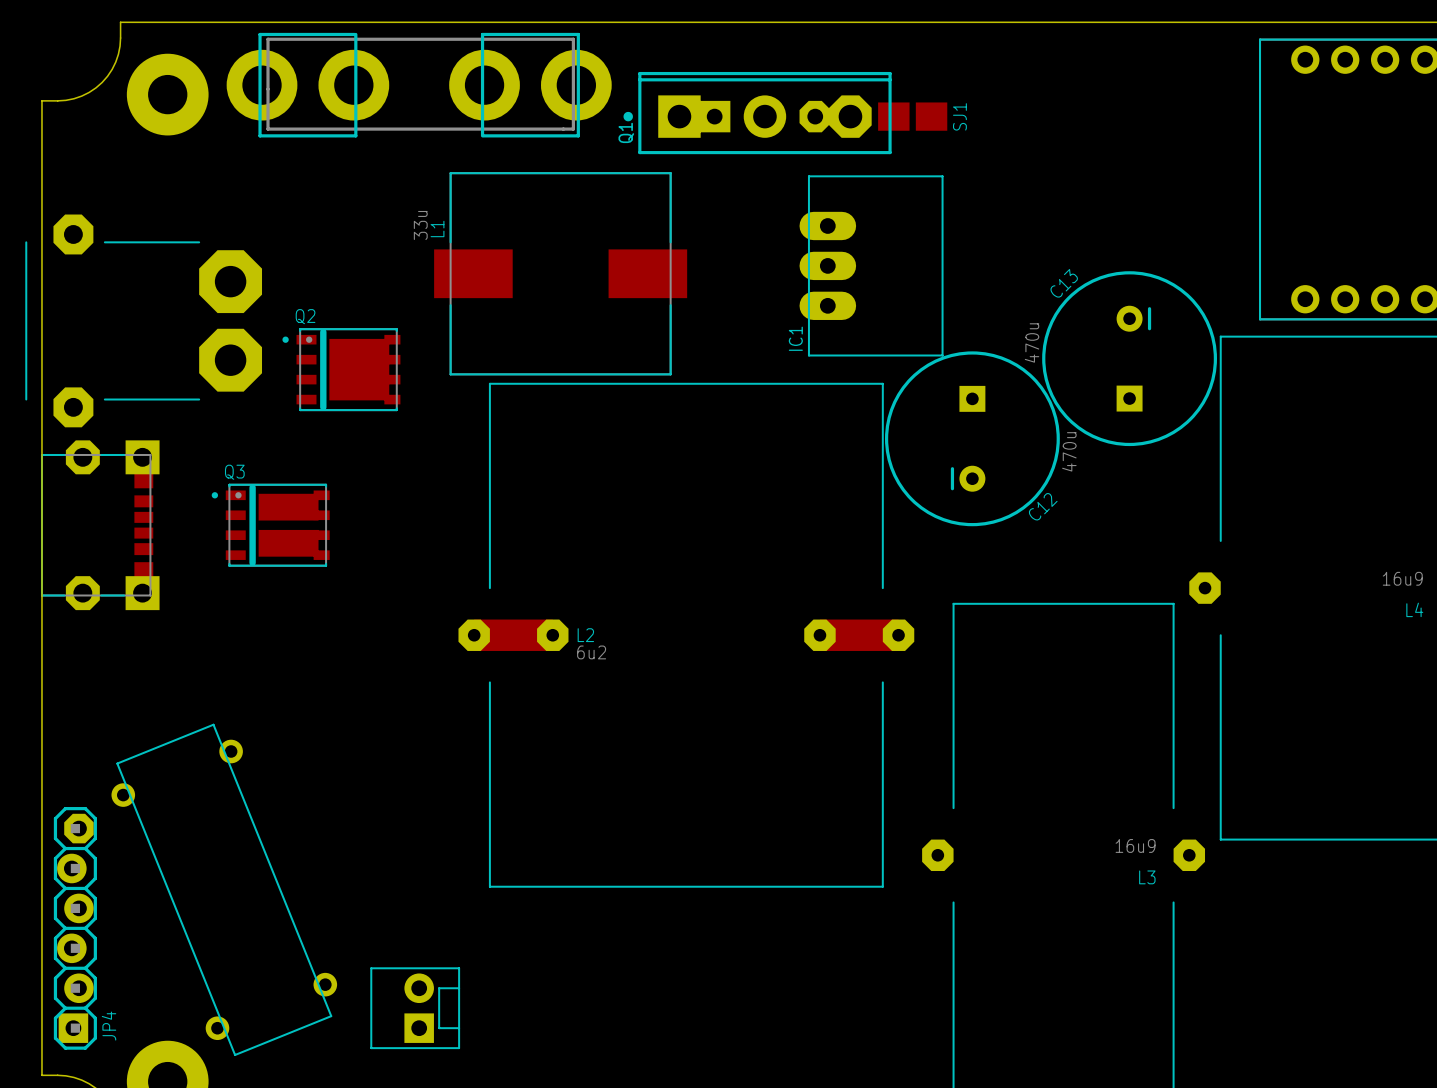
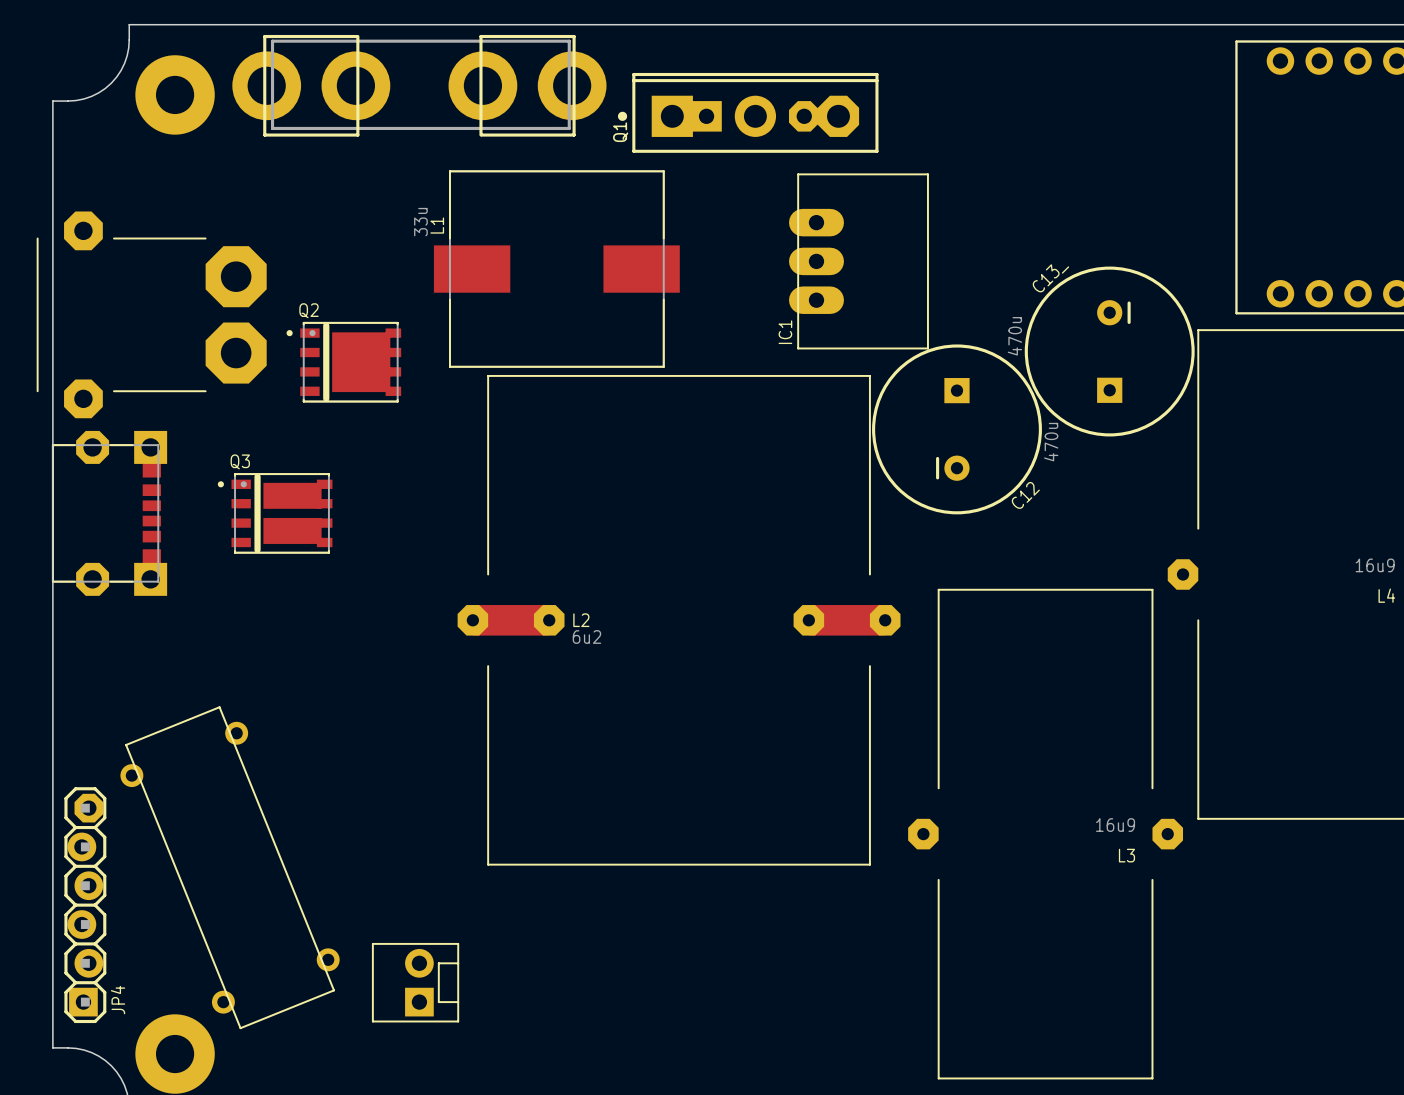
SJ1: (912, 116) -> none
C13 name: C13 (1064, 283) -> C13_ (1050, 278)

